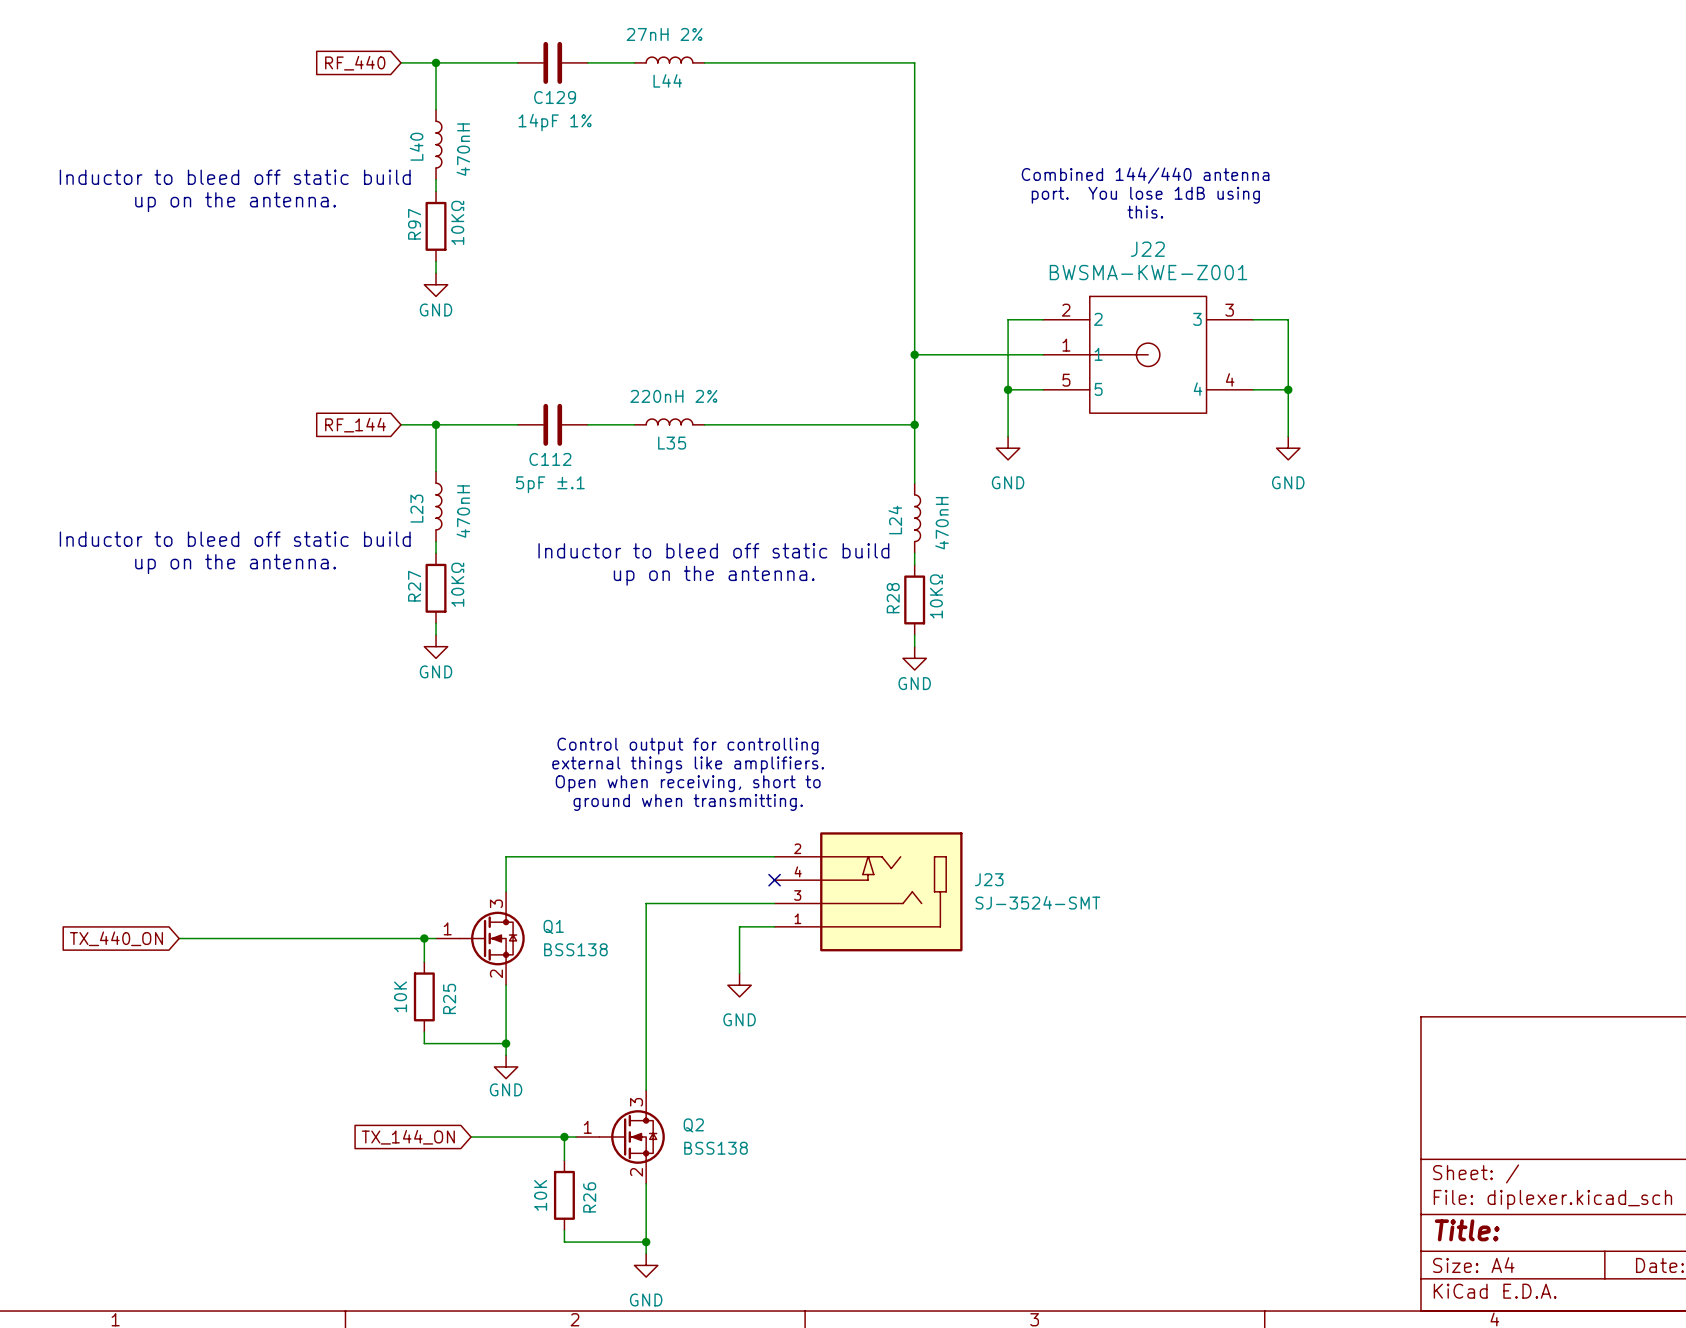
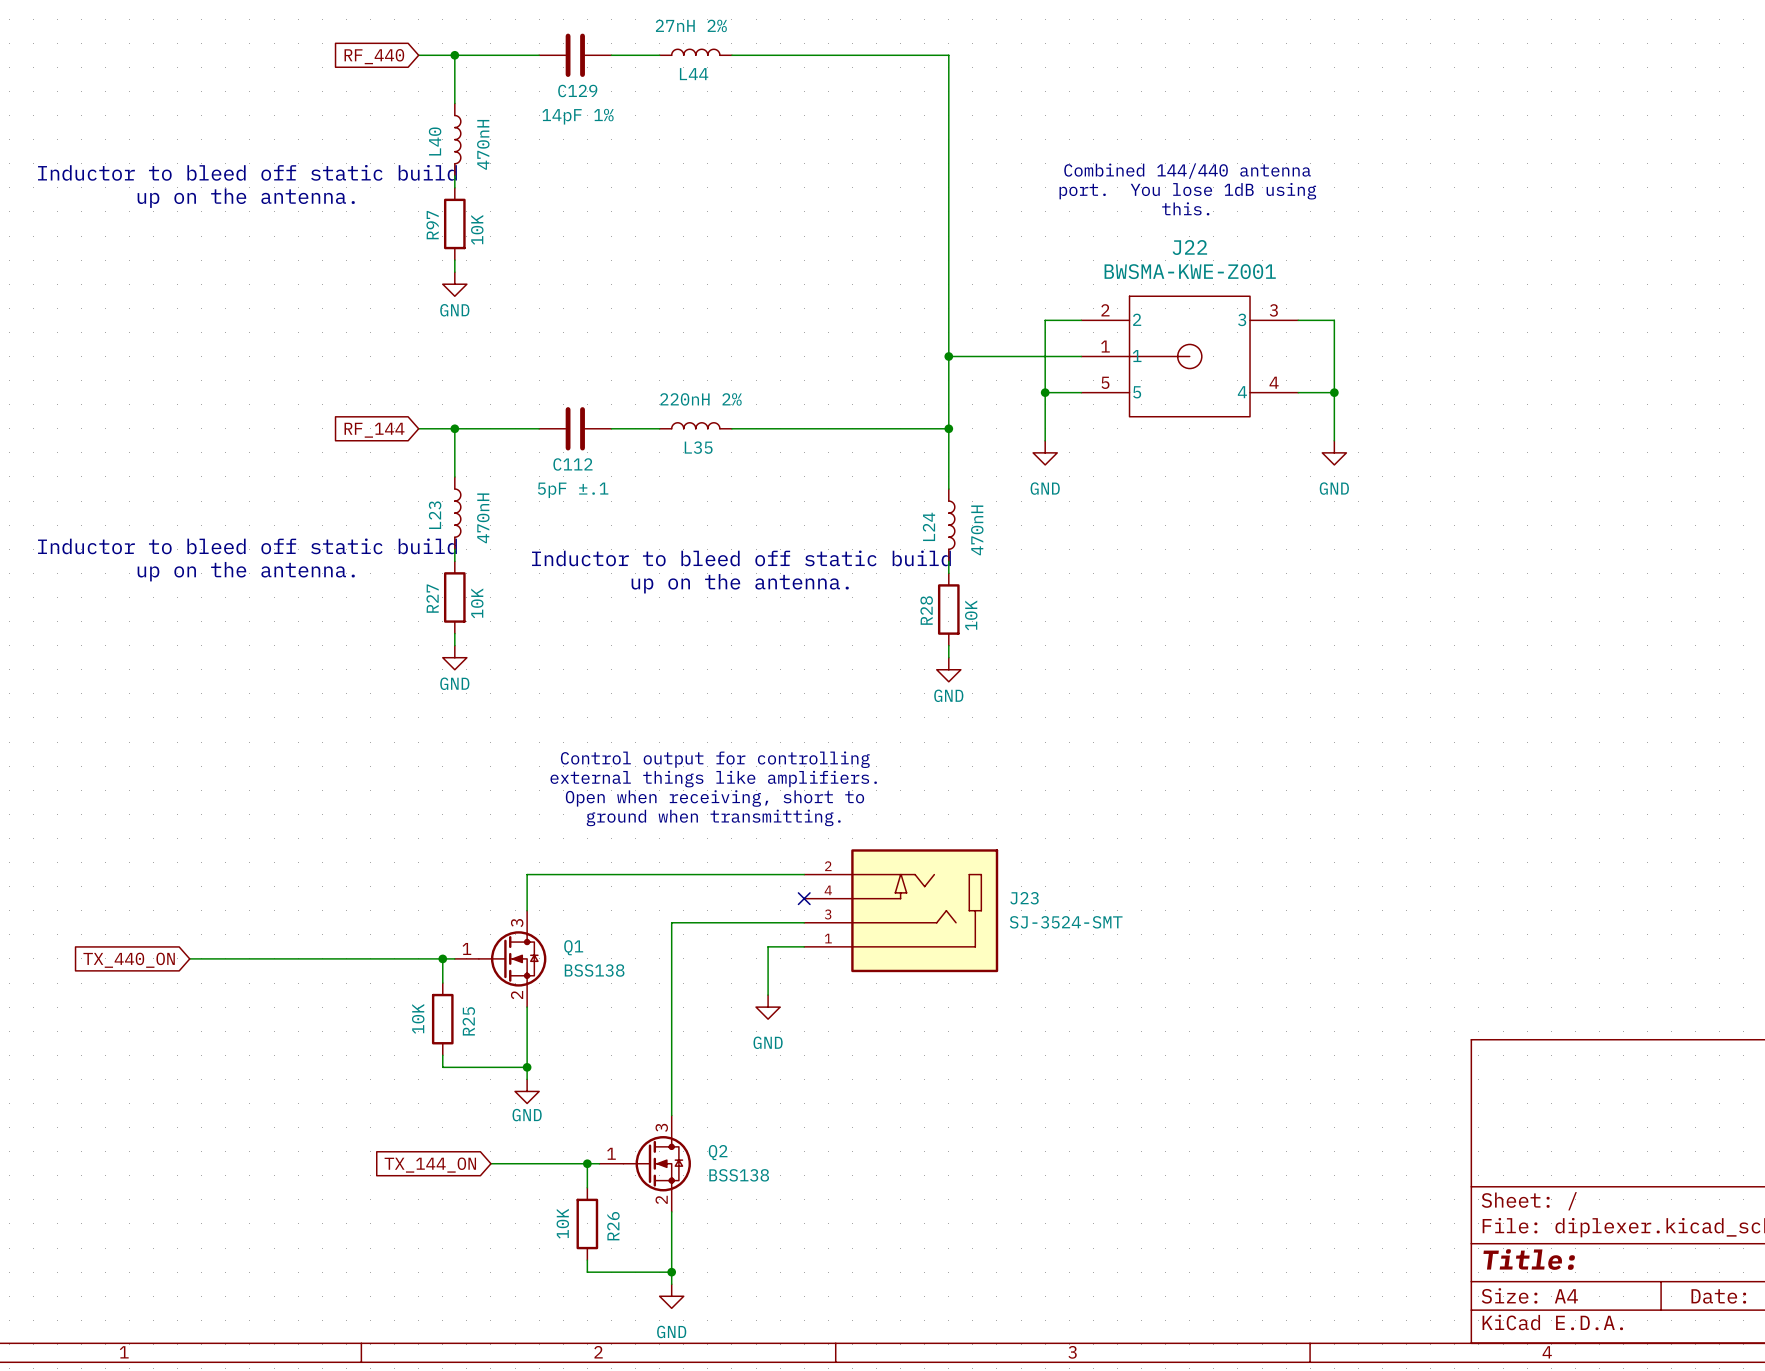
R97 value: 10KΩ (457, 222) -> 10K (477, 229)
R27 value: 10KΩ (457, 584) -> 10K (477, 603)
R28 value: 10KΩ (936, 596) -> 10K (971, 615)

